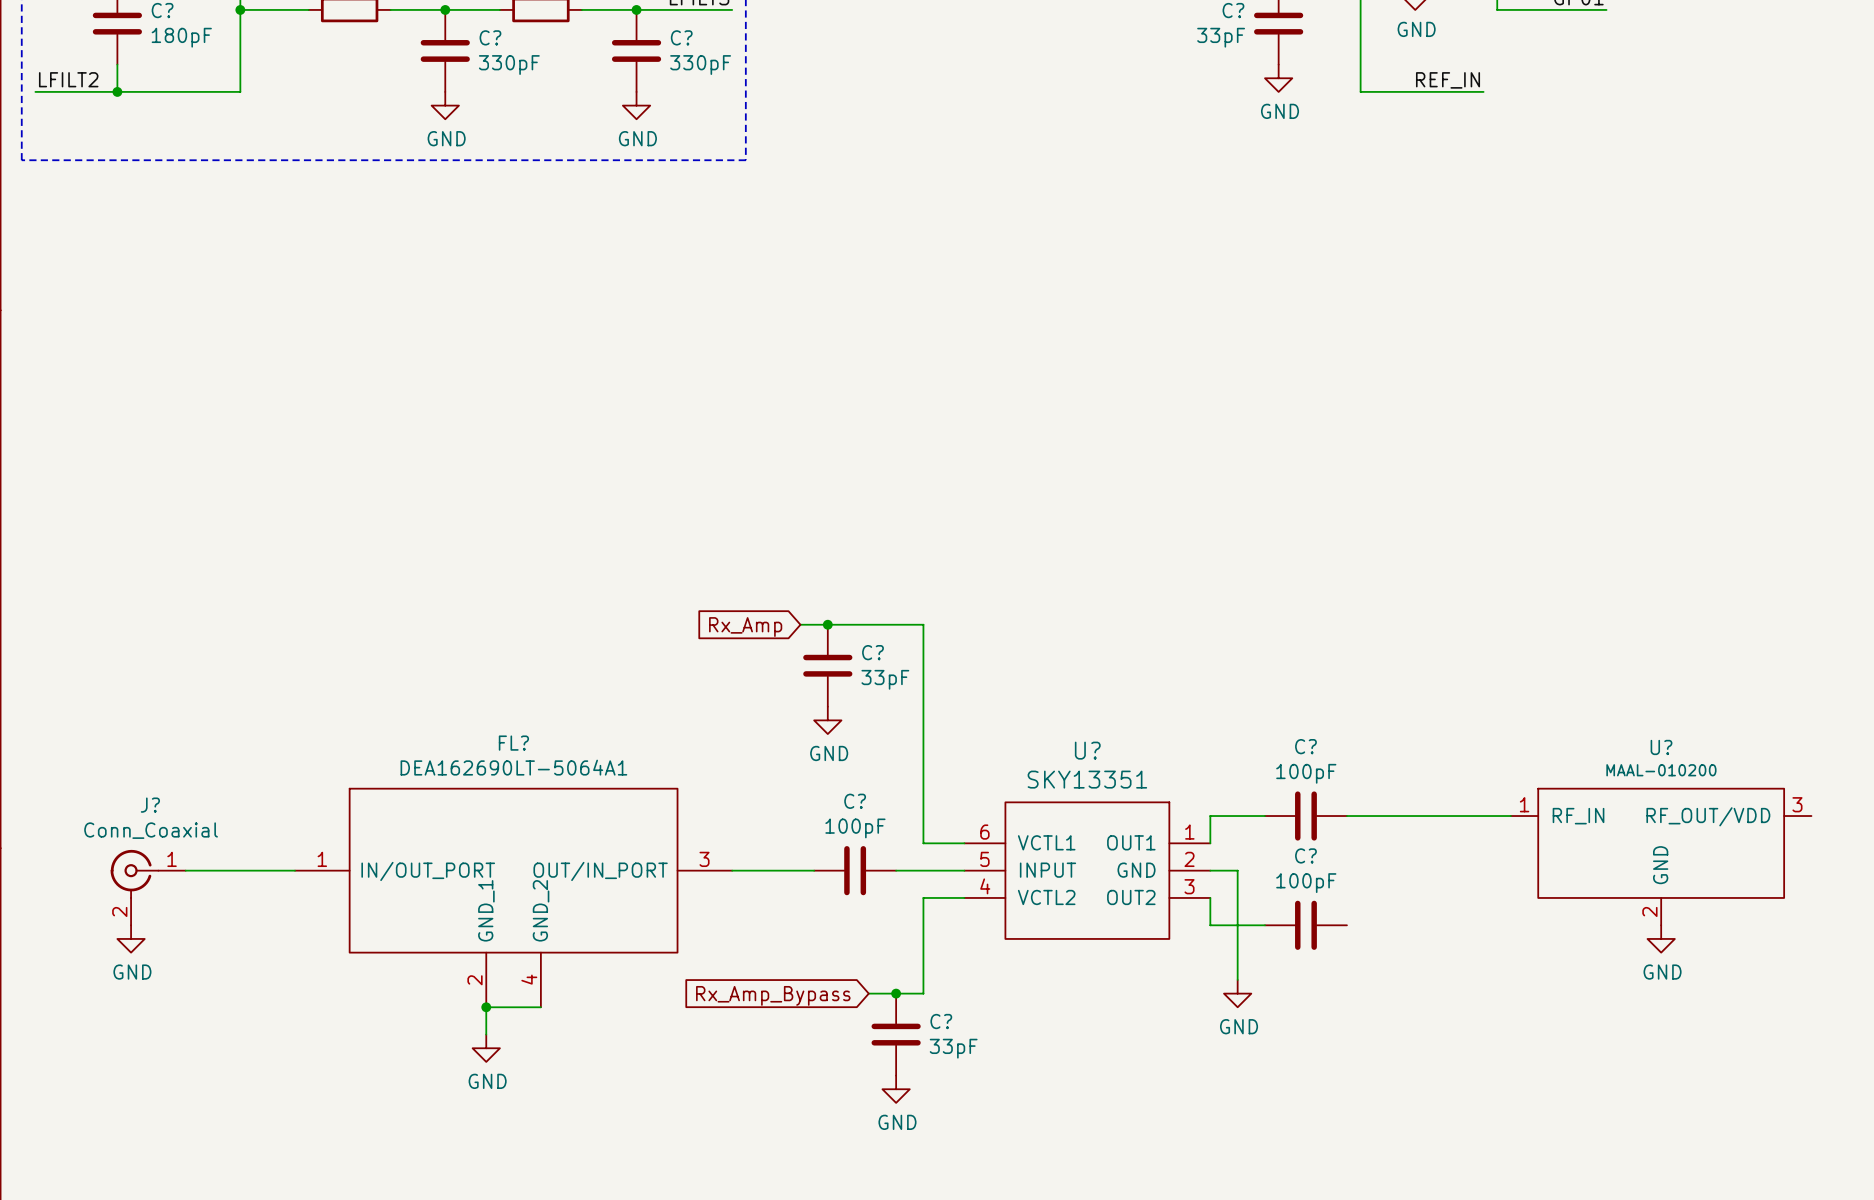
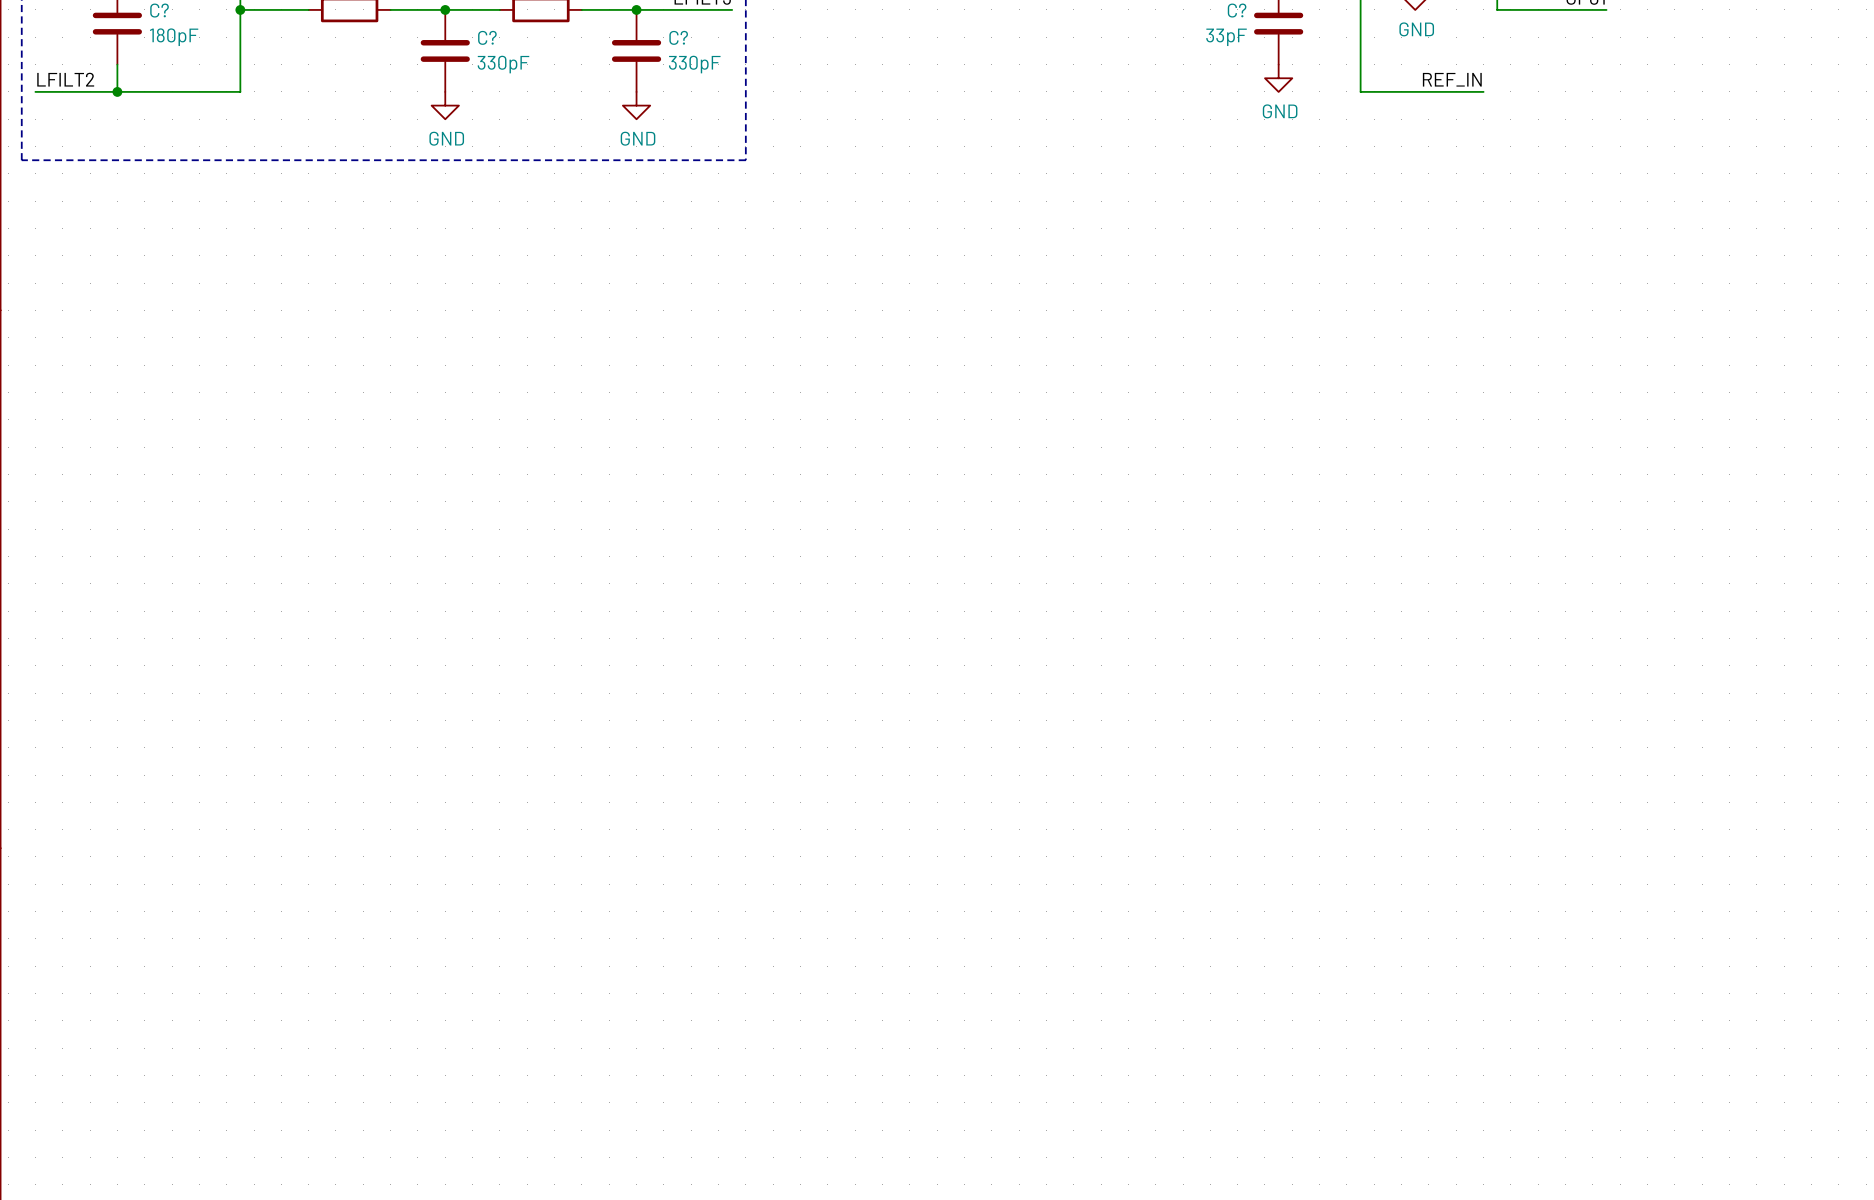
wire: (800, 624) (923, 624) (923, 843) (964, 843) -> none
junction: (827, 624) -> none
global label: Rx_Amp (745, 627) -> none
C?: 33pF (827, 665) -> none
power symbol: GND (827, 720) -> none
wire: (1264, 816) (1210, 816) (1210, 843) -> none
C?: 100pF (1305, 816) -> none
wire: (1346, 816) (1510, 816) -> none
U?: MAAL-010200 (1661, 856) -> none
wire: (185, 870) (295, 870) -> none
wire: (732, 870) (814, 870) -> none
C?: 100pF (855, 870) -> none
wire: (896, 870) (964, 870) -> none
U?: SKY13351 (1087, 870) -> none
wire: (1210, 870) (1237, 870) (1237, 979) -> none
J?: Conn_Coaxial (148, 887) -> none
FL?: DEA162690LT-5064A1 (513, 897) -> none
wire: (964, 897) (923, 897) (923, 993) (868, 993) -> none
wire: (1210, 897) (1210, 925) (1264, 925) -> none
C?: 100pF (1305, 925) -> none
power symbol: GND (131, 938) -> none
power symbol: GND (1661, 938) -> none
junction: (896, 993) -> none
power symbol: GND (1237, 993) -> none
global label: Rx_Amp_Bypass (773, 995) -> none
junction: (486, 1007) -> none
wire: (540, 1007) (486, 1007) (486, 1034) -> none
C?: 33pF (896, 1034) -> none
power symbol: GND (486, 1048) -> none
power symbol: GND (896, 1089) -> none

